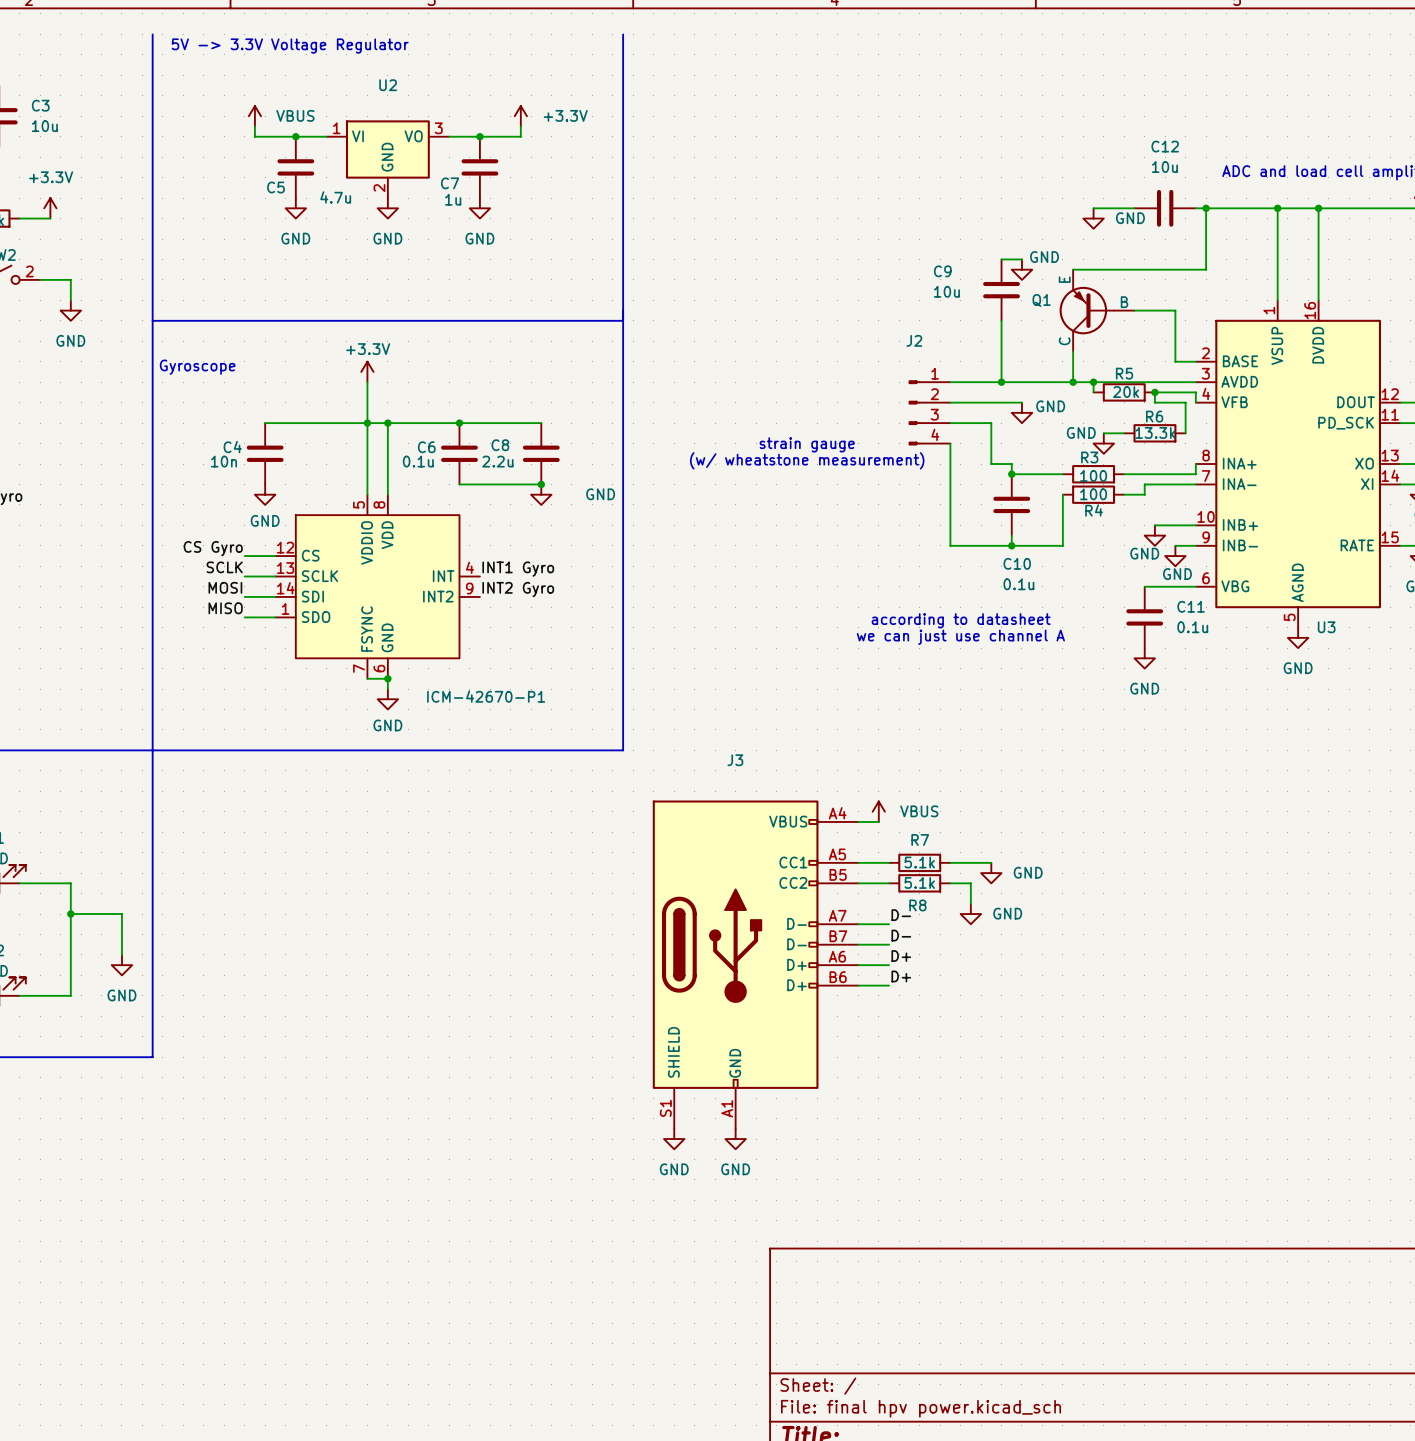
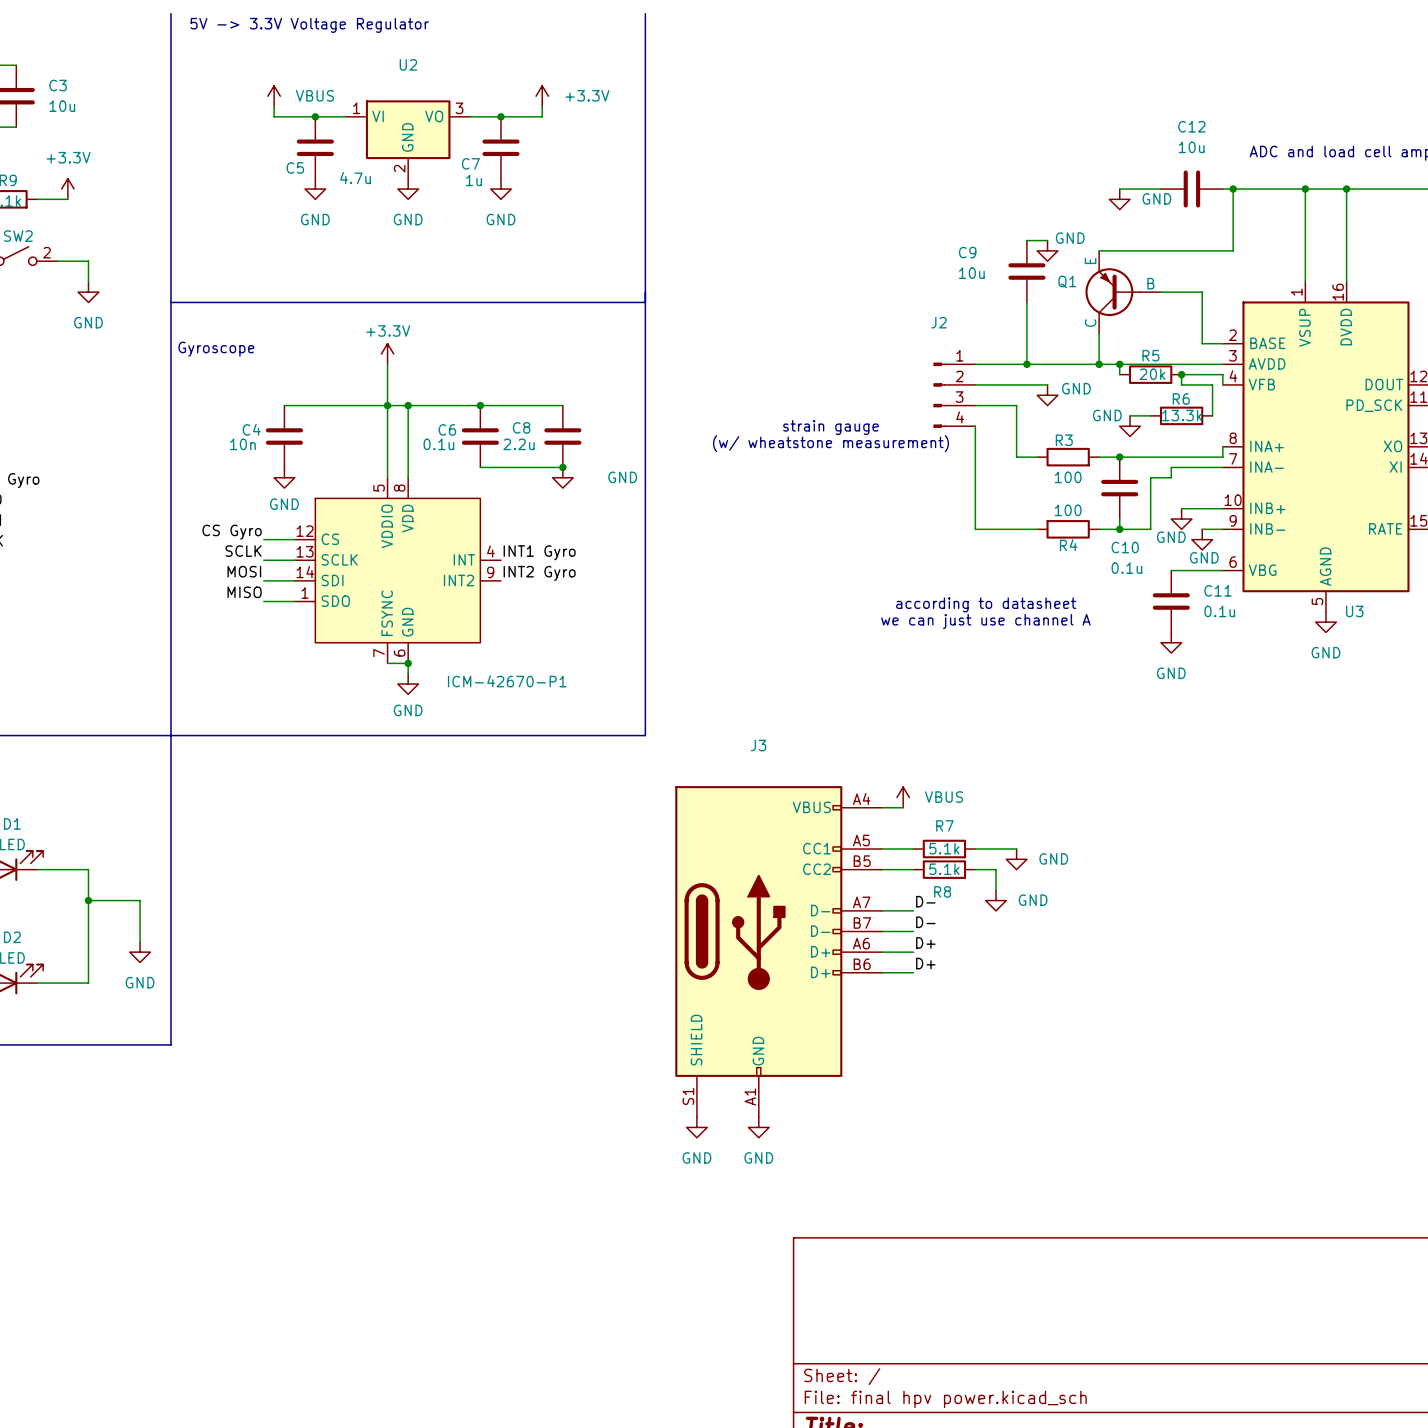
wire: (991, 464) (1011, 464) (1011, 474) (1062, 474) -> (1016, 446) (1016, 457) (1037, 457)
junction: (1011, 474) -> none
wire: none -> (1099, 457) (1150, 457)
junction: none -> (1119, 457)
R3 position: (1093, 474) -> (1068, 457)
wire: (1062, 494) (1062, 545) (1011, 545) (1011, 535) -> none
R4 position: (1093, 494) -> (1068, 529)
wire: none -> (1150, 477) (1150, 529) (1099, 529)
C10 position: (1011, 504) -> (1119, 488)
wire: none -> (1119, 519) (1119, 529)
junction: (1011, 545) -> none
junction: none -> (1119, 529)

